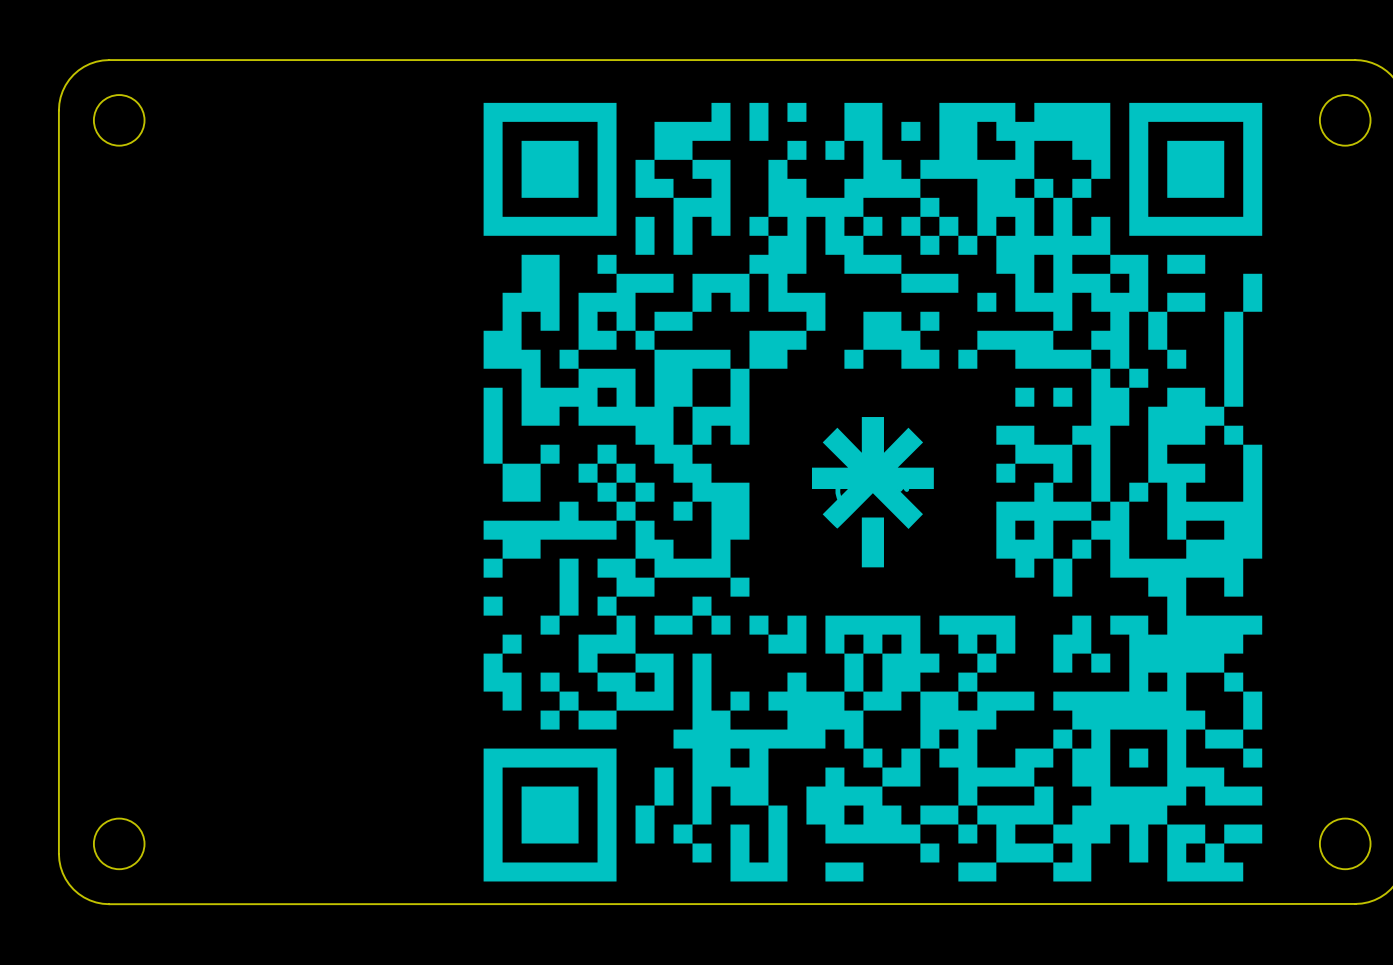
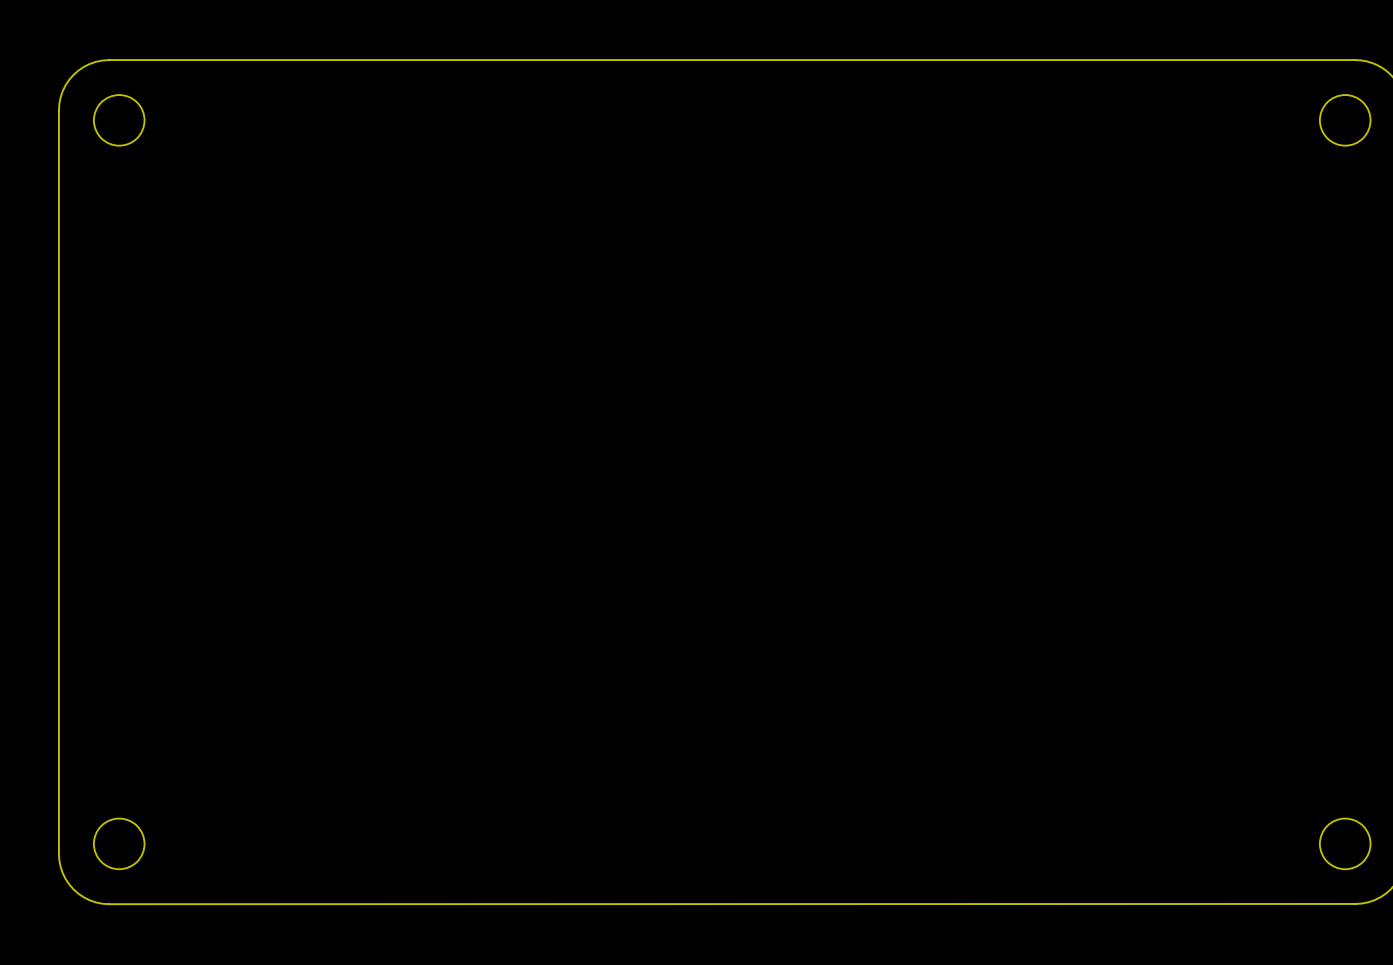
part: (872, 492) -> none

